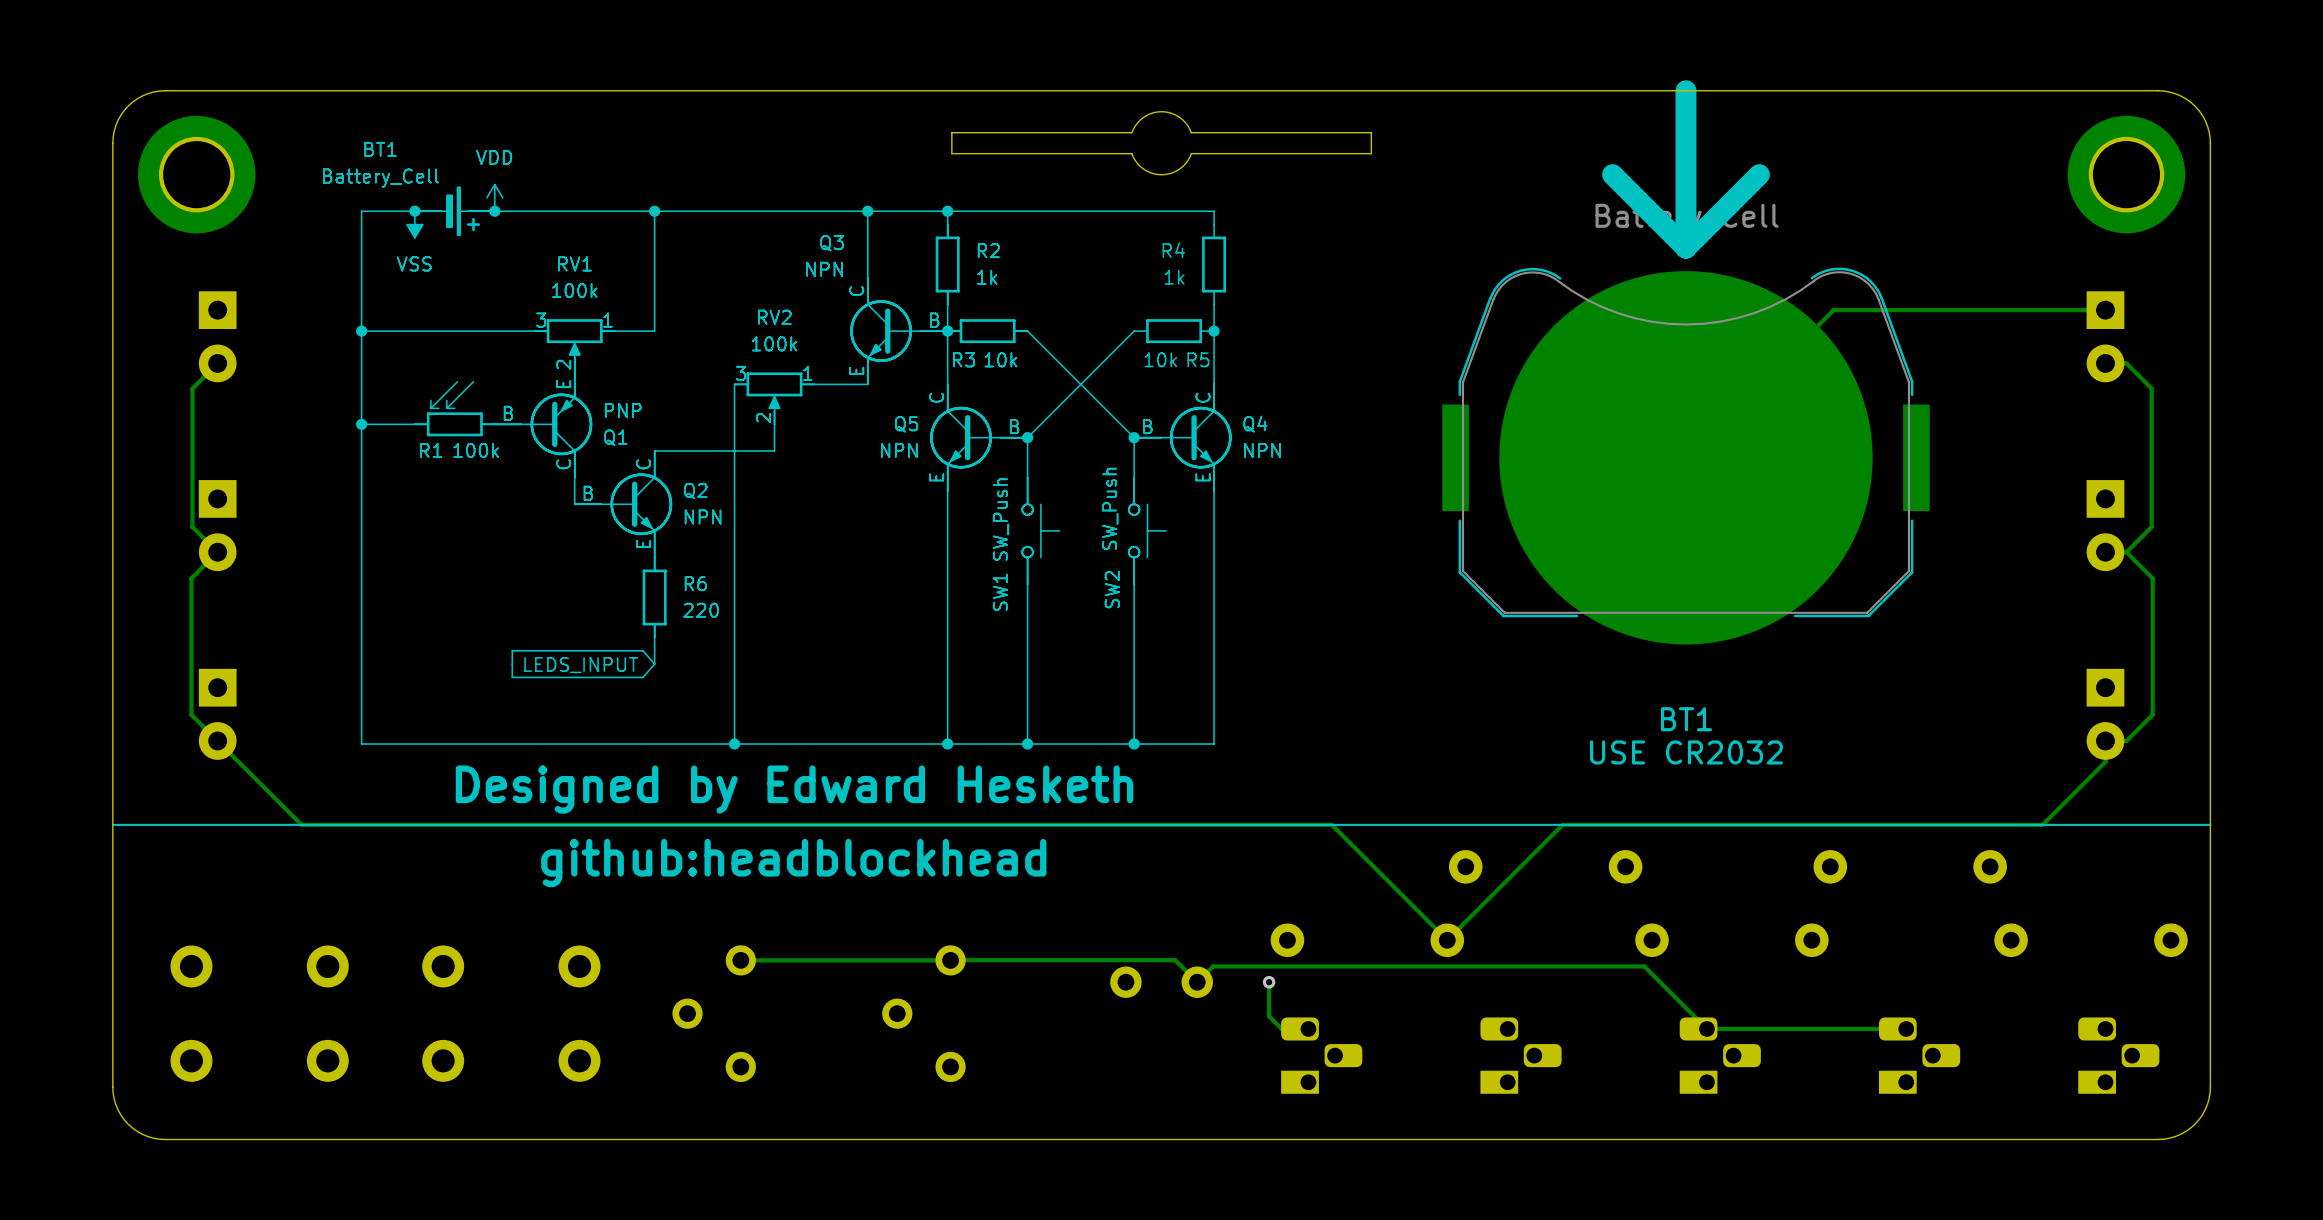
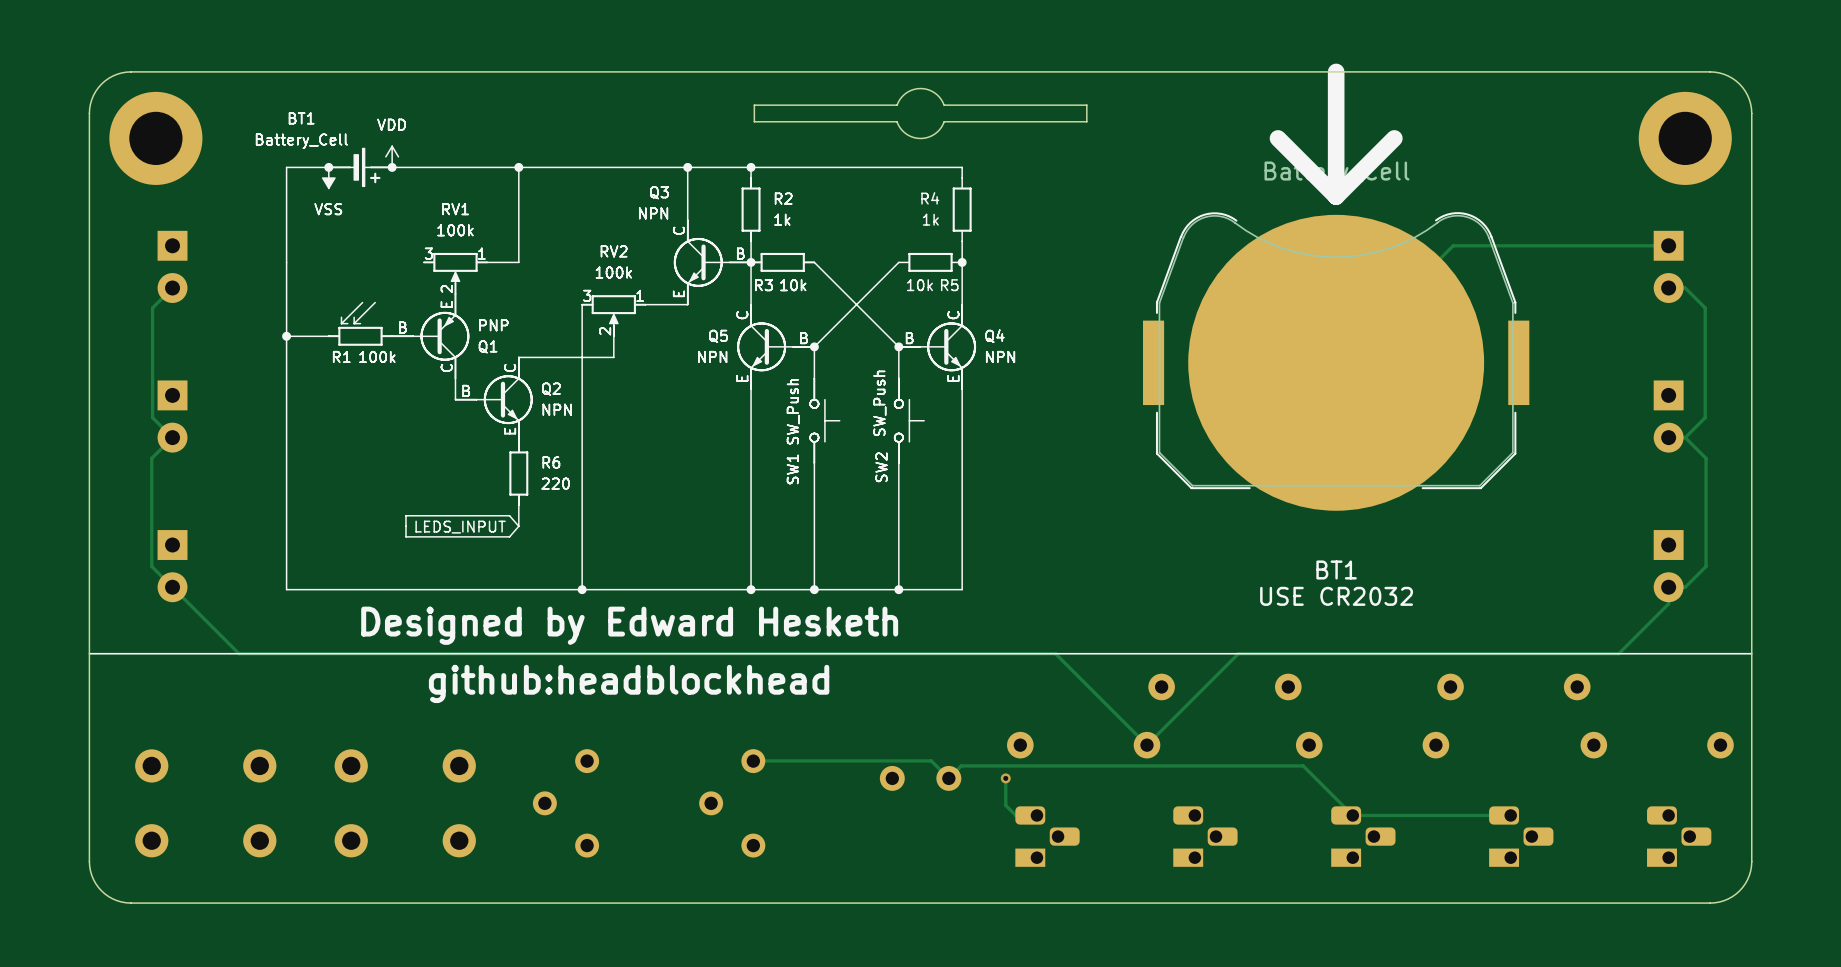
drawing: [356, 325, 368, 337] -> none
line: (534, 331) (361, 331) -> none
track: (950, 960) (740, 960) -> none

